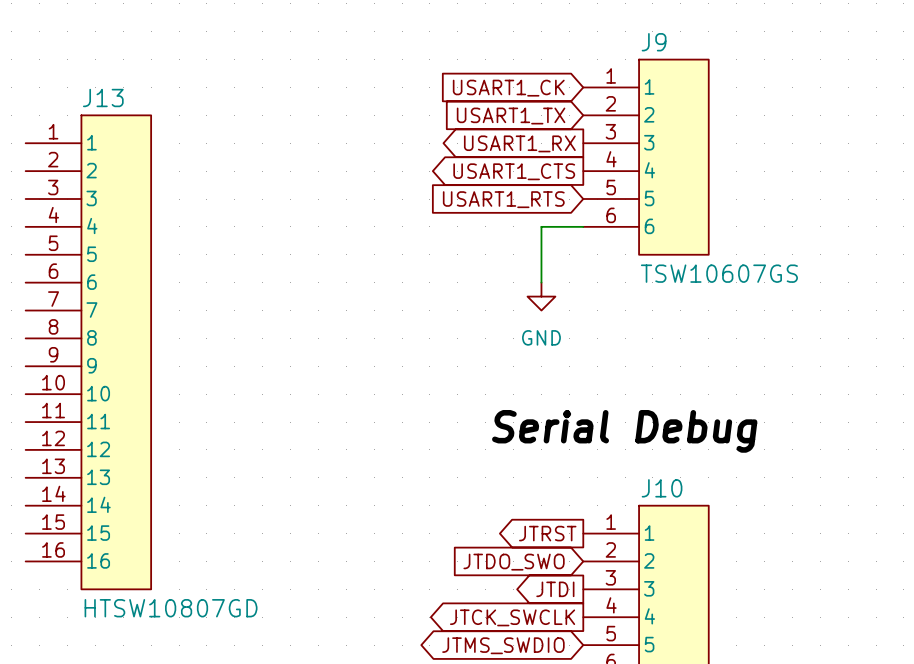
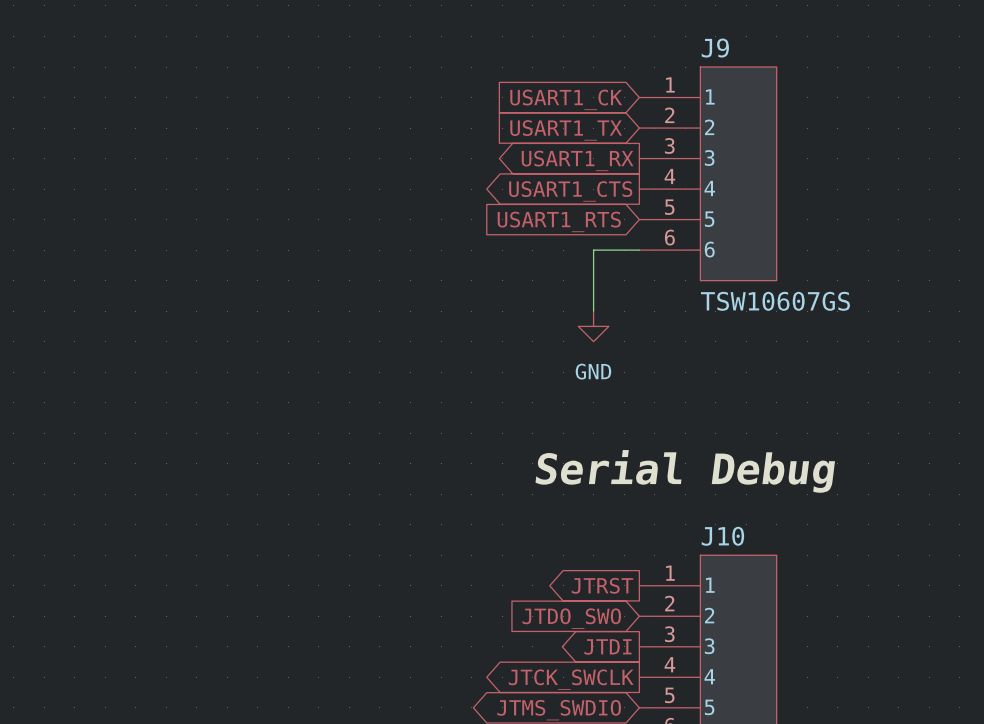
J13: HTSW10807GD (88, 352) -> none

